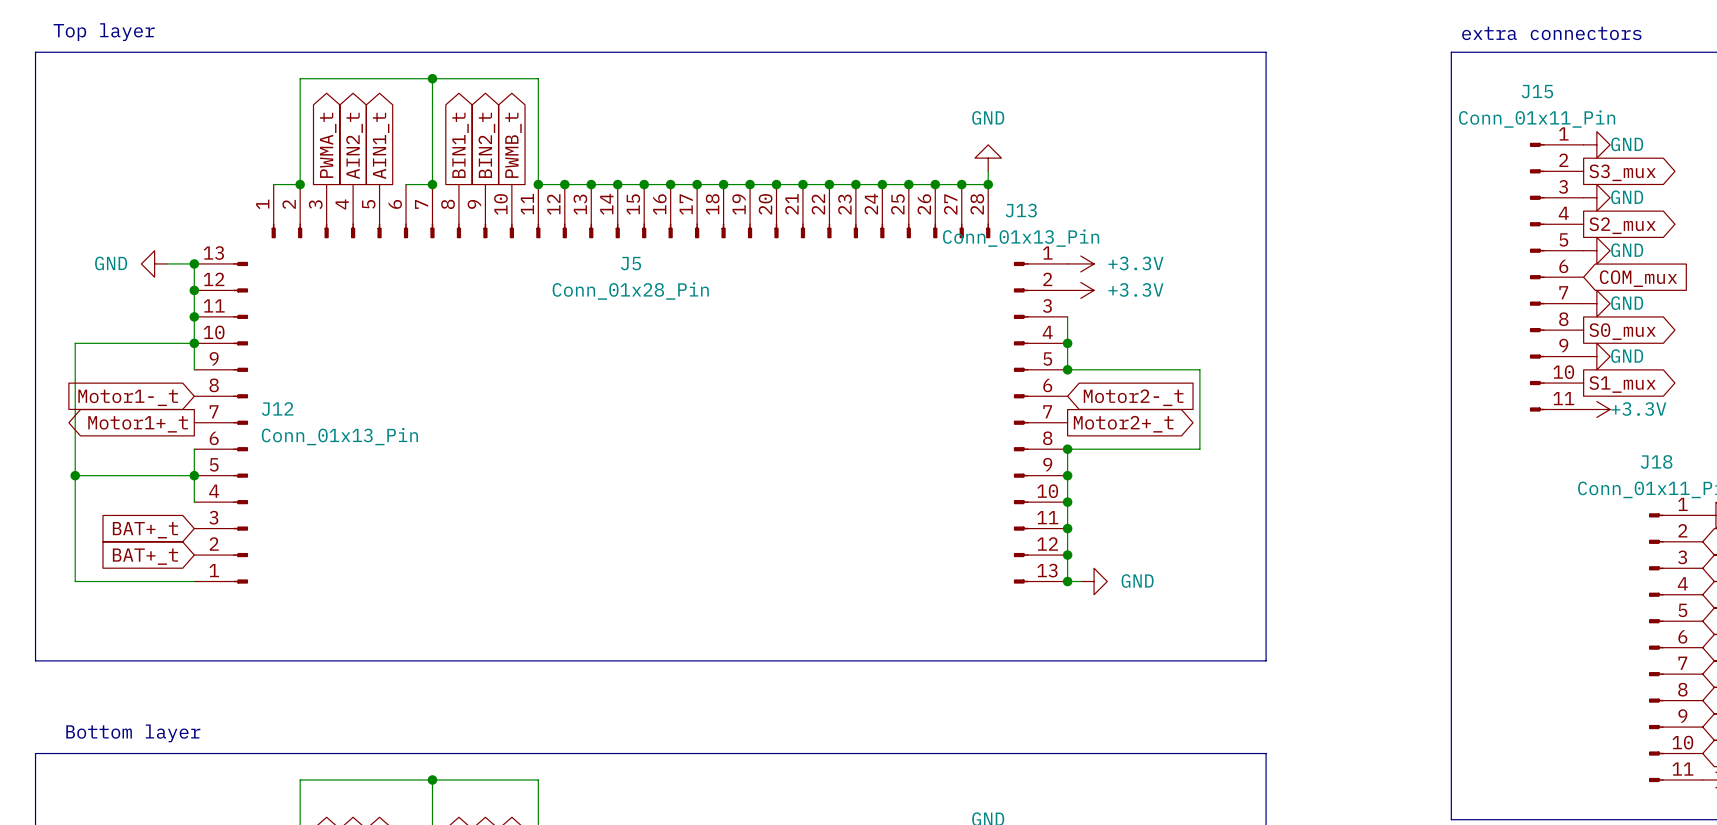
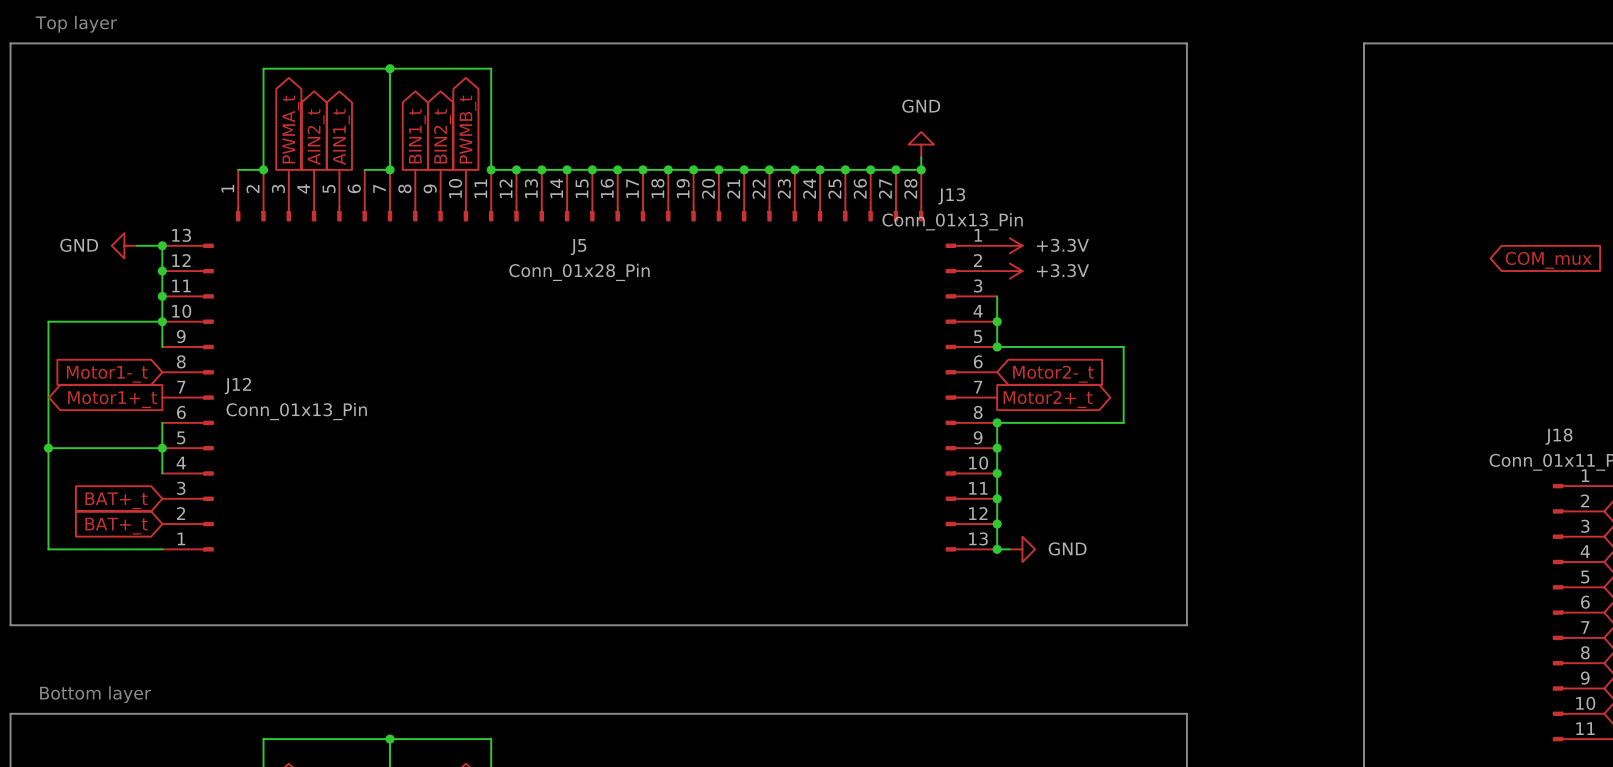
text: extra connectors (1551, 33) -> none
power symbol: GND (1596, 144) -> none
global label: S3_mux (1622, 172) -> none
power symbol: GND (1596, 197) -> none
global label: S2_mux (1622, 225) -> none
power symbol: GND (1596, 250) -> none
J15: Conn_01x11_Pin (1556, 277) -> none
power symbol: GND (1596, 303) -> none
global label: S0_mux (1622, 331) -> none
power symbol: GND (1596, 356) -> none
global label: S1_mux (1622, 384) -> none
power symbol: +3.3V (1596, 409) -> none

